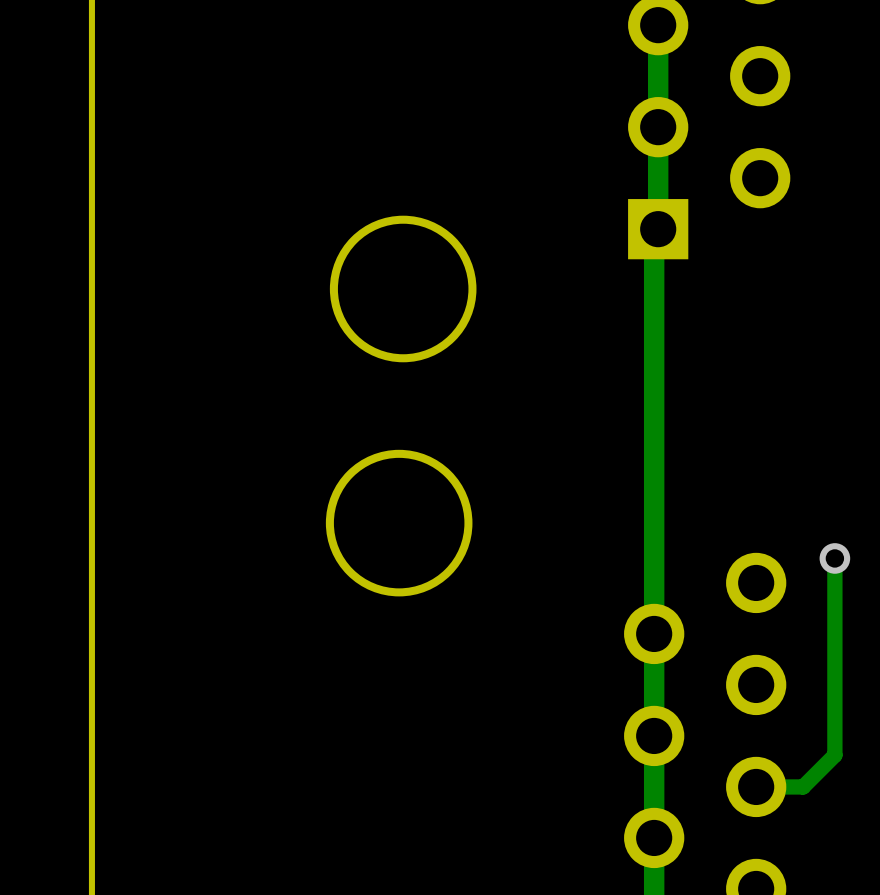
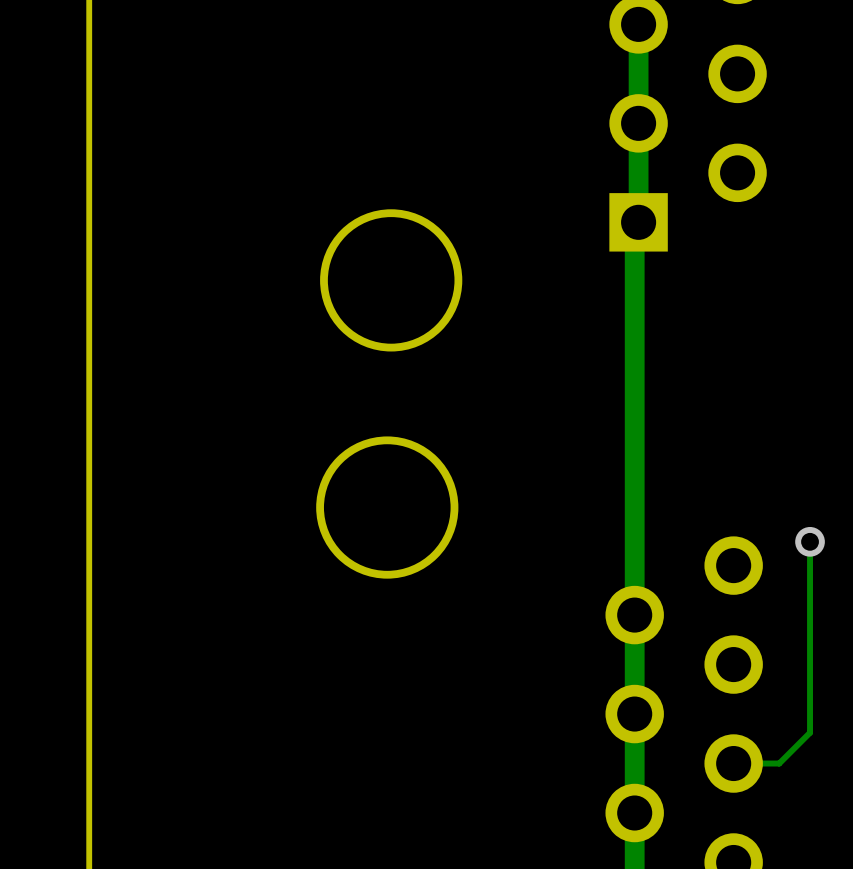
track width: thick (834, 558) (834, 755) (803, 786) (756, 786) -> thin (810, 541) (810, 732) (779, 763) (733, 763)

